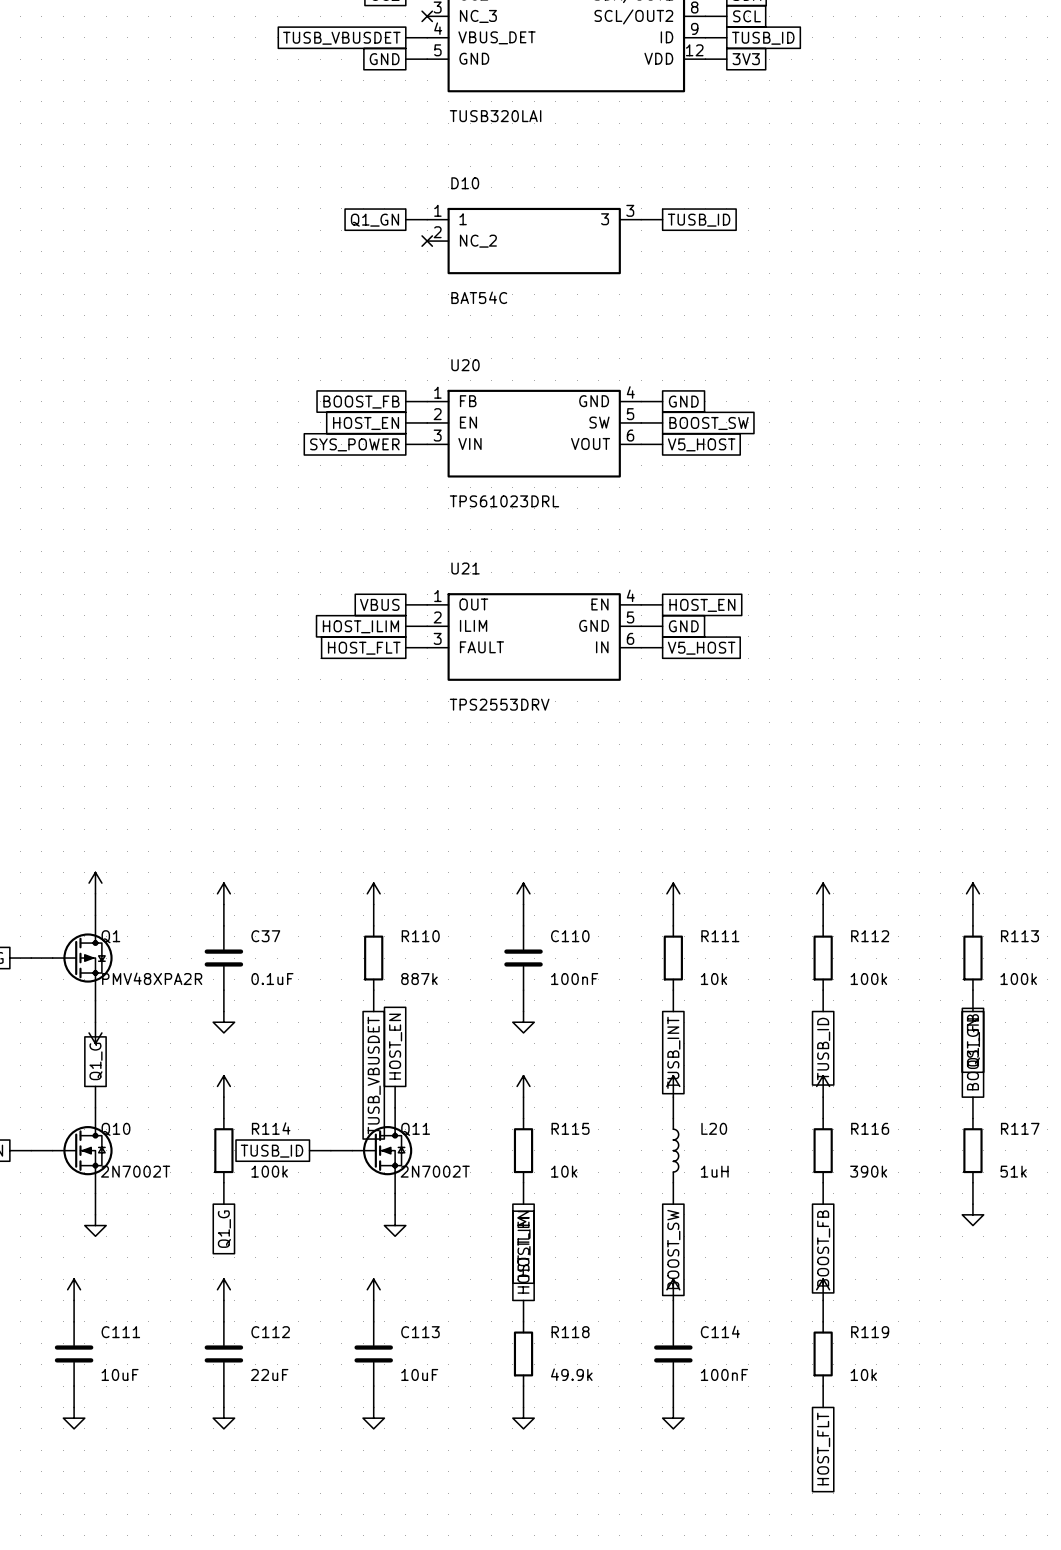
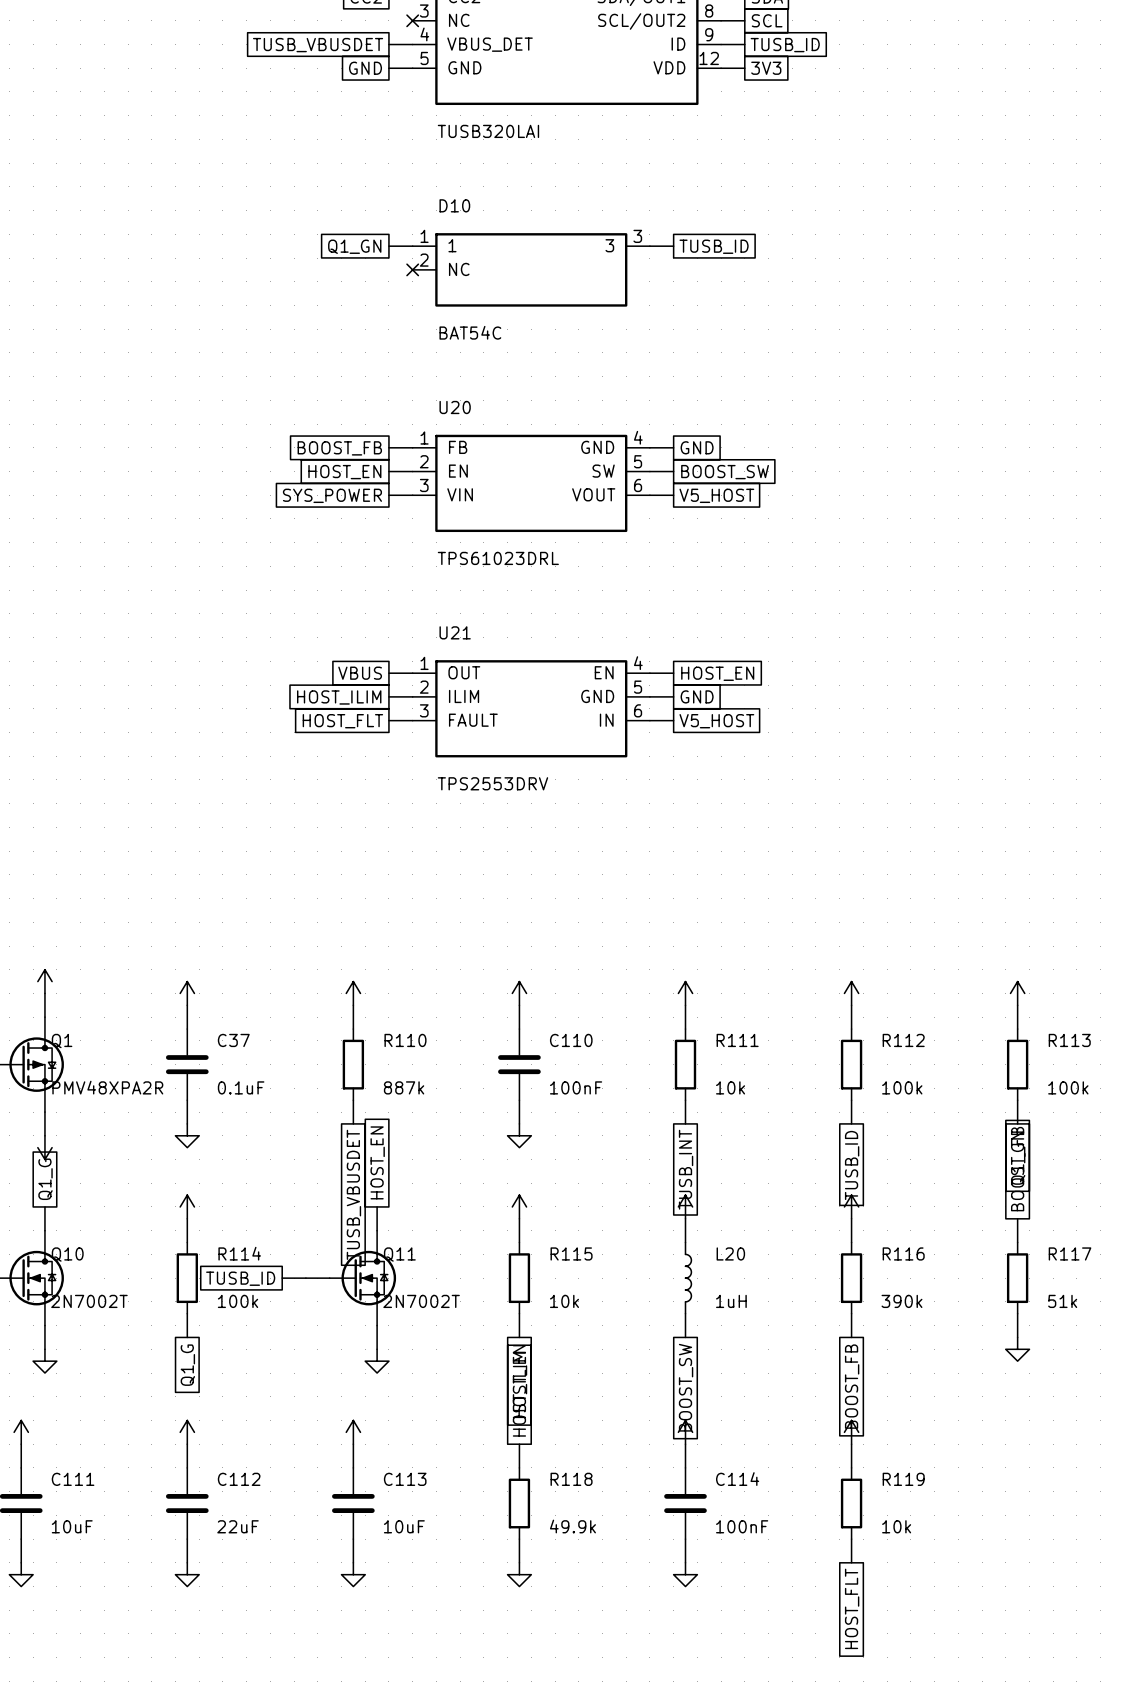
part pin name: NC_3 (478, 16) -> NC (459, 20)
D10 pin name: NC_2 (478, 241) -> NC (459, 269)

